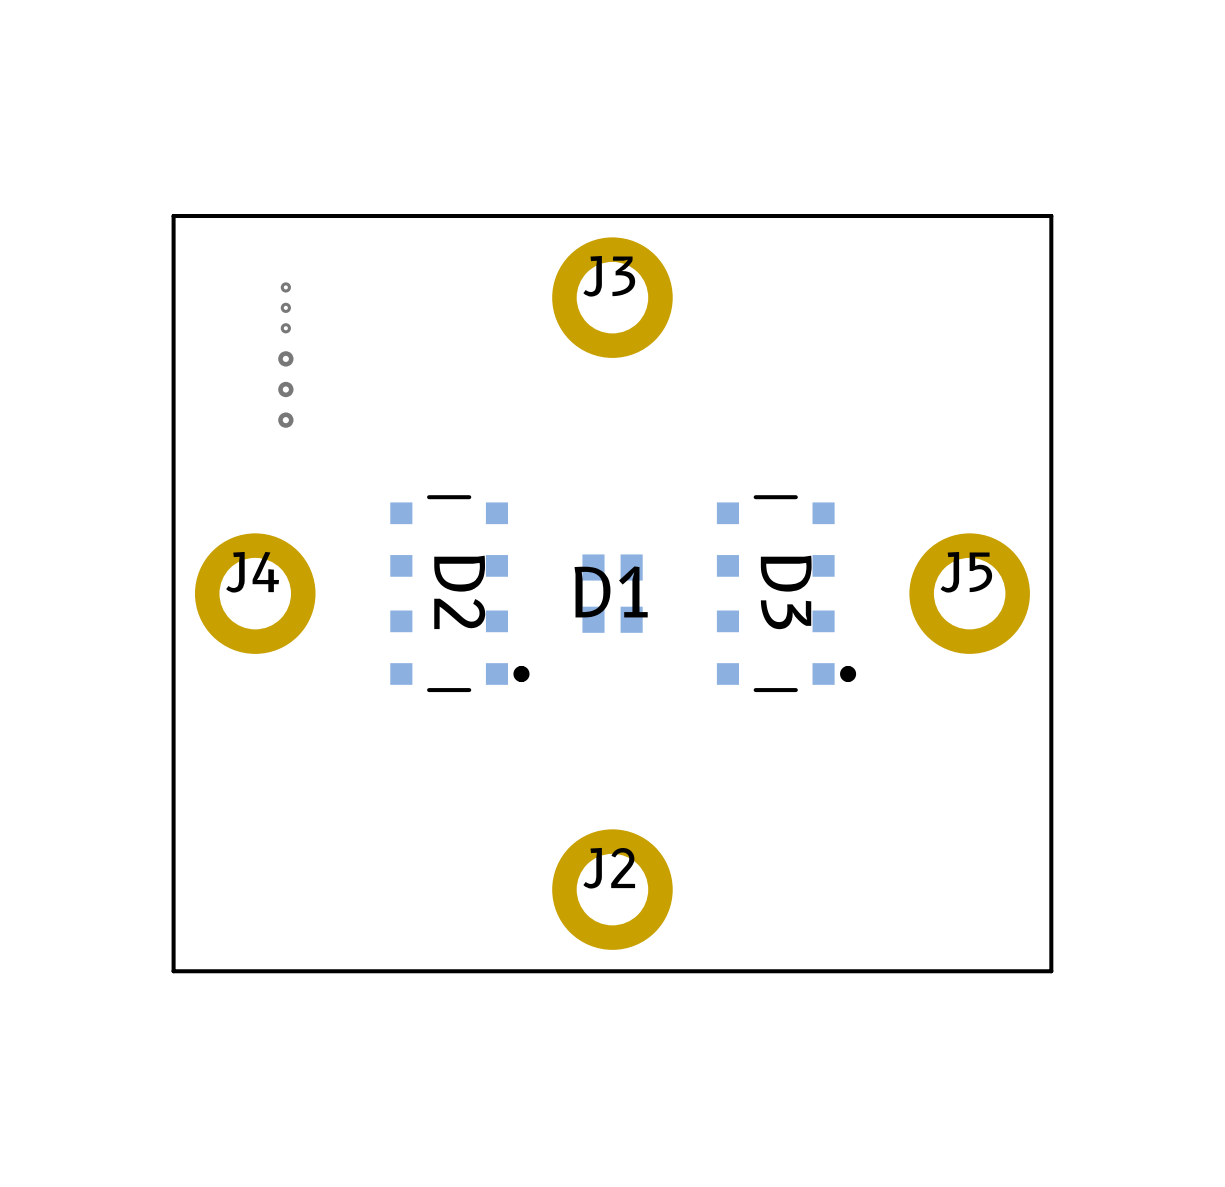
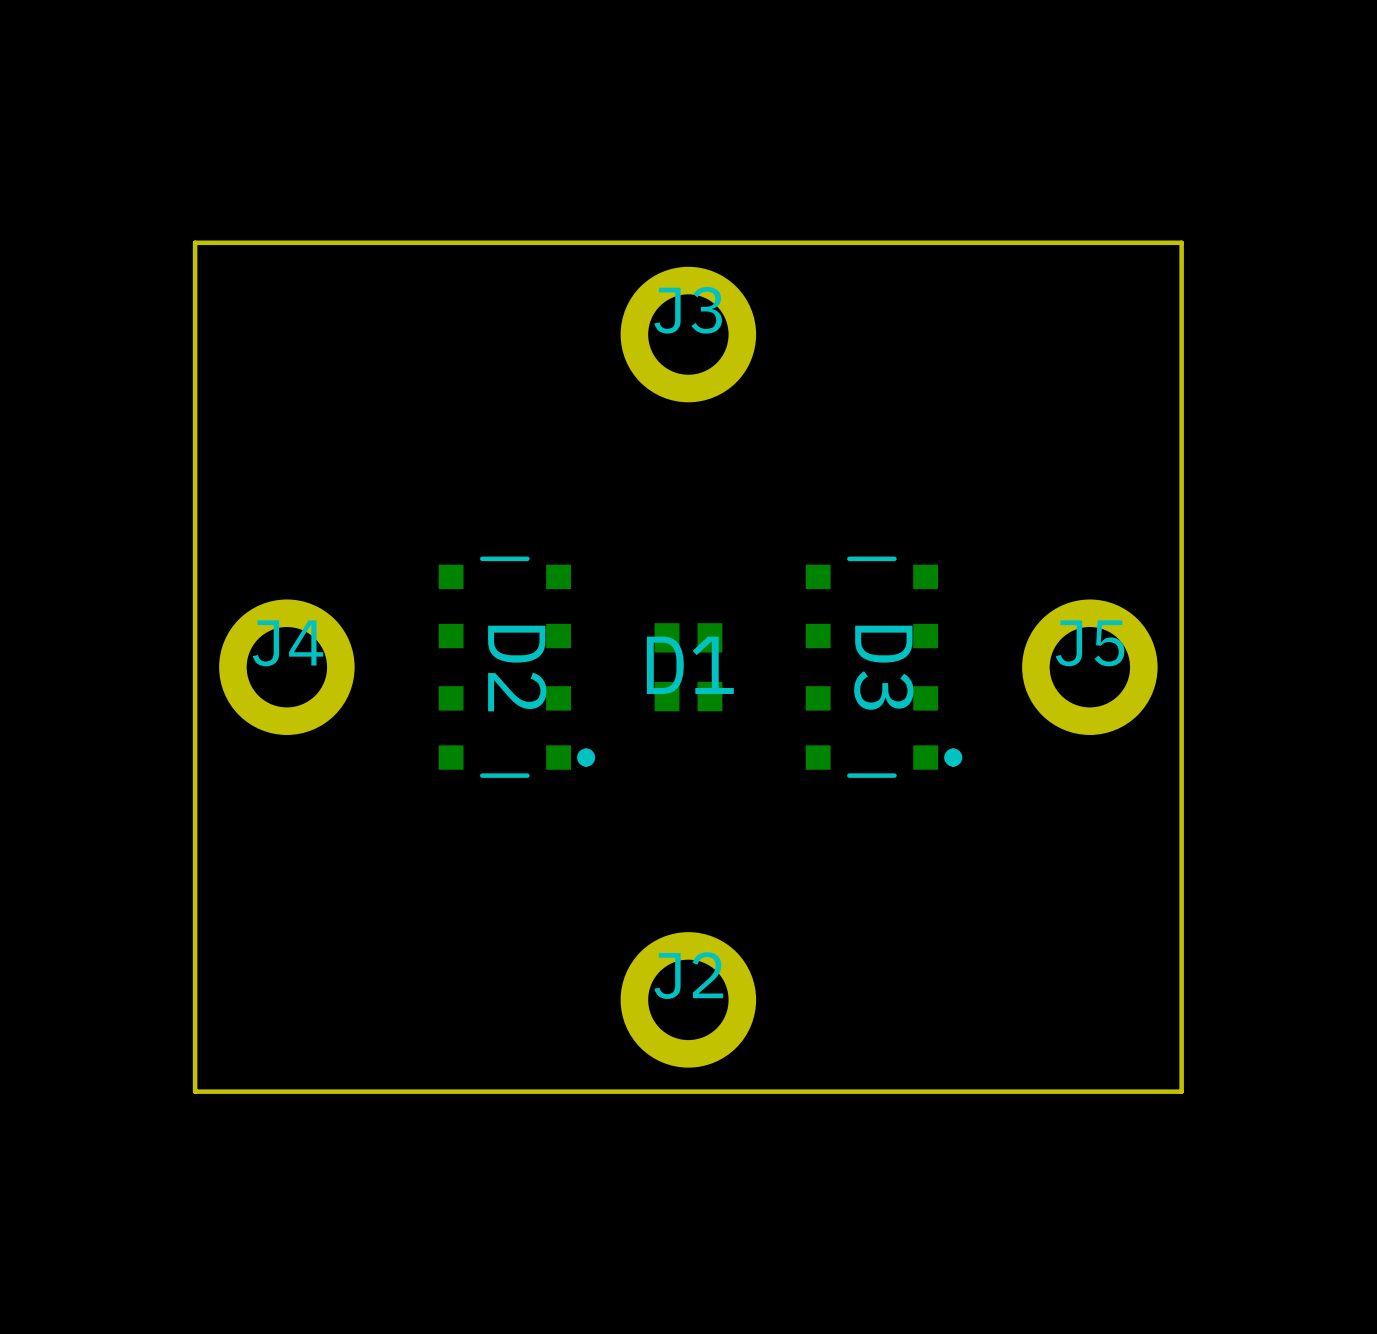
via: (285, 287) -> none
via: (285, 307) -> none
via: (285, 328) -> none
via: (285, 358) -> none
via: (285, 389) -> none
via: (285, 420) -> none

